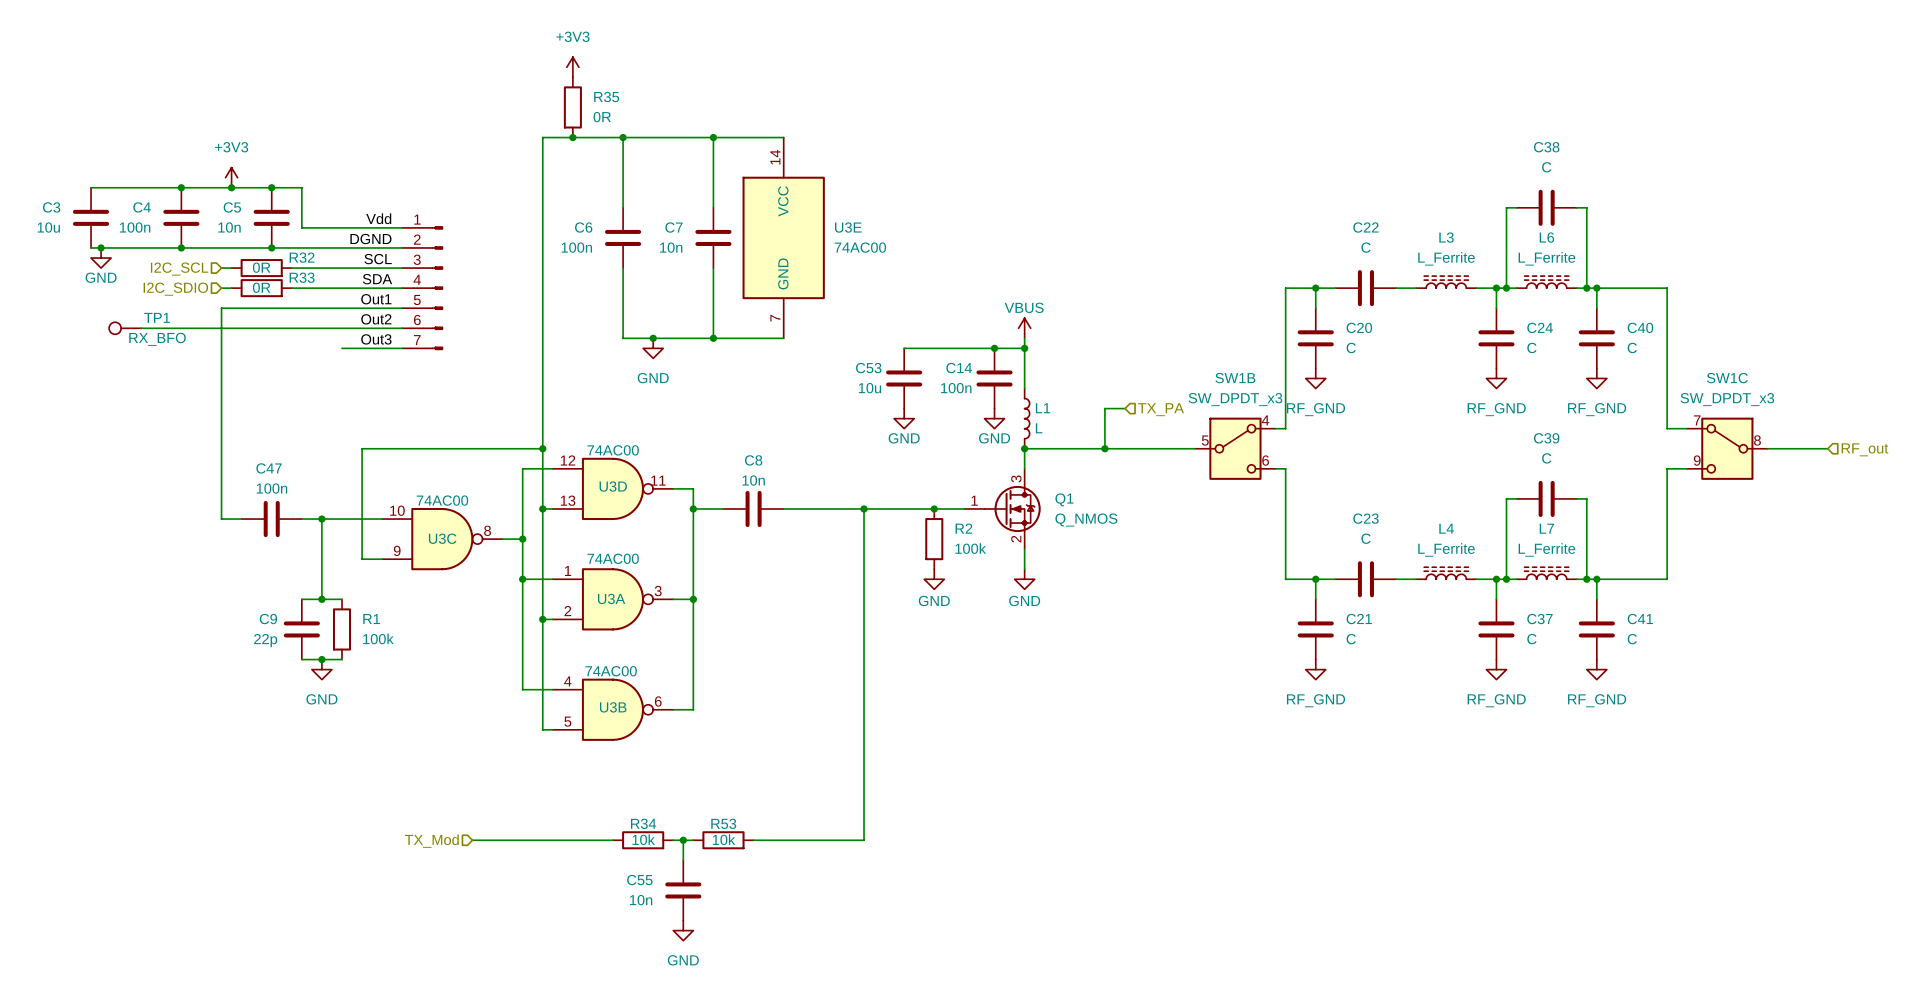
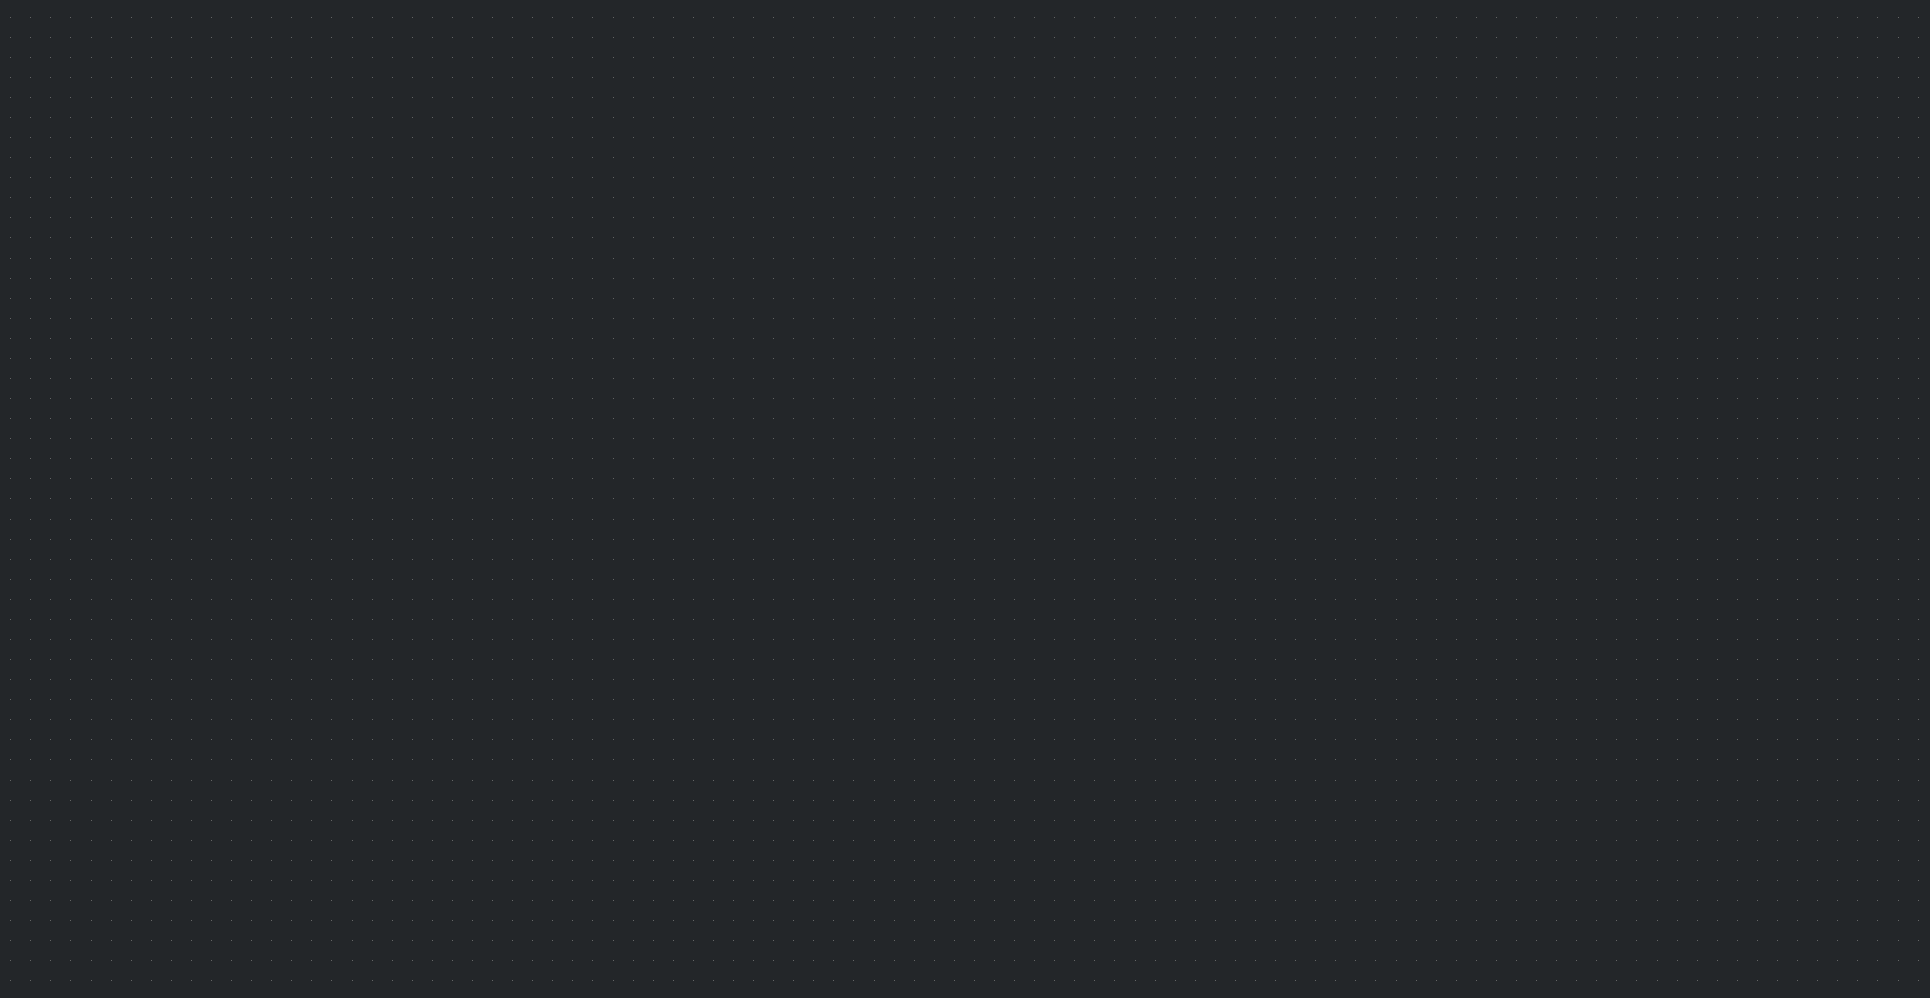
power symbol: +3V3 (572, 67) -> none
R35: 0R (572, 107) -> none
junction: (572, 137) -> none
wire: (623, 137) (623, 207) -> none
junction: (623, 137) -> none
wire: (713, 137) (713, 207) -> none
junction: (713, 137) -> none
wire: (783, 137) (542, 137) (542, 729) (552, 729) -> none
power symbol: +3V3 (231, 177) -> none
wire: (91, 187) (301, 187) (301, 227) (402, 227) -> none
junction: (181, 187) -> none
junction: (231, 187) -> none
junction: (271, 187) -> none
wire: (1516, 207) (1506, 207) (1506, 288) -> none
C38: C (1546, 207) -> none
wire: (1576, 207) (1586, 207) (1586, 288) -> none
C3: 10u (91, 217) -> none
C4: 100n (181, 217) -> none
C5: 10n (271, 217) -> none
label: Vdd (378, 218) -> none
C6: 100n (623, 237) -> none
C7: 10n (713, 237) -> none
U3E: 74AC00 (783, 237) -> none
label: DGND (370, 239) -> none
wire: (91, 247) (402, 247) -> none
junction: (101, 247) -> none
junction: (181, 247) -> none
junction: (271, 247) -> none
power symbol: GND (101, 258) -> none
label: SCL (378, 259) -> none
wire: (221, 268) (231, 268) -> none
R32: 0R (261, 268) -> none
wire: (291, 268) (402, 268) -> none
wire: (623, 268) (623, 338) (783, 338) -> none
wire: (713, 268) (713, 338) -> none
hierarchical label: I2C_SCL (179, 269) -> none
label: SDA (377, 279) -> none
L3: L_Ferrite (1446, 282) -> none
L6: L_Ferrite (1546, 282) -> none
wire: (221, 288) (231, 288) -> none
R33: 0R (261, 288) -> none
wire: (291, 288) (402, 288) -> none
part: (422, 288) -> none
wire: (1315, 288) (1315, 308) -> none
junction: (1315, 288) -> none
wire: (1335, 288) (1285, 288) (1285, 428) (1275, 428) -> none
C22: C (1365, 288) -> none
wire: (1396, 288) (1416, 288) -> none
wire: (1476, 288) (1516, 288) -> none
wire: (1496, 288) (1496, 308) -> none
junction: (1496, 288) -> none
junction: (1506, 288) -> none
wire: (1576, 288) (1667, 288) (1667, 428) (1687, 428) -> none
junction: (1586, 288) -> none
wire: (1596, 288) (1596, 308) -> none
junction: (1596, 288) -> none
hierarchical label: I2C_SDIO (175, 289) -> none
label: Out1 (376, 299) -> none
wire: (402, 308) (221, 308) (221, 519) (241, 519) -> none
label: Out2 (376, 319) -> none
TP1: RX_BFO (125, 328) -> none
wire: (141, 328) (402, 328) -> none
power symbol: VBUS (1024, 328) -> none
junction: (653, 338) -> none
junction: (713, 338) -> none
wire: (1024, 338) (1024, 388) -> none
C20: C (1315, 338) -> none
C24: C (1496, 338) -> none
C40: C (1596, 338) -> none
label: Out3 (376, 339) -> none
wire: (341, 348) (402, 348) -> none
power symbol: GND (653, 348) -> none
wire: (904, 348) (1024, 348) -> none
junction: (994, 348) -> none
junction: (1024, 348) -> none
C53: 10u (904, 378) -> none
C14: 100n (994, 378) -> none
power symbol: RF_GND (1315, 378) -> none
power symbol: RF_GND (1496, 378) -> none
power symbol: RF_GND (1596, 378) -> none
wire: (1125, 408) (1104, 408) (1104, 448) -> none
hierarchical label: TX_PA (1161, 409) -> none
power symbol: GND (904, 418) -> none
power symbol: GND (994, 418) -> none
L1: L (1027, 418) -> none
wire: (542, 448) (362, 448) (362, 559) (382, 559) -> none
junction: (542, 448) -> none
junction: (1024, 448) -> none
junction: (1104, 448) -> none
wire: (1195, 448) (1024, 448) (1024, 468) -> none
SW1B: SW_DPDT_x3 (1235, 448) -> none
SW1C: SW_DPDT_x3 (1727, 448) -> none
wire: (1767, 448) (1827, 448) -> none
hierarchical label: RF_out (1864, 449) -> none
wire: (552, 468) (522, 468) (522, 689) (552, 689) -> none
wire: (1275, 468) (1285, 468) (1285, 579) (1335, 579) -> none
wire: (1687, 468) (1667, 468) (1667, 579) (1576, 579) -> none
U3D: 74AC00 (613, 488) -> none
wire: (673, 488) (693, 488) (693, 709) (673, 709) -> none
wire: (1516, 498) (1506, 498) (1506, 579) -> none
C39: C (1546, 498) -> none
wire: (1576, 498) (1586, 498) (1586, 579) -> none
wire: (542, 508) (552, 508) -> none
junction: (542, 508) -> none
wire: (693, 508) (723, 508) -> none
junction: (693, 508) -> none
C8: 10n (753, 508) -> none
wire: (783, 508) (964, 508) -> none
wire: (864, 508) (864, 840) (753, 840) -> none
junction: (864, 508) -> none
junction: (934, 508) -> none
Q1: Q_NMOS (1002, 508) -> none
C47: 100n (271, 519) -> none
wire: (301, 519) (382, 519) -> none
wire: (321, 519) (321, 599) -> none
junction: (321, 519) -> none
U3C: 74AC00 (442, 539) -> none
wire: (502, 539) (522, 539) -> none
junction: (522, 539) -> none
R2: 100k (934, 539) -> none
wire: (1024, 549) (1024, 569) -> none
L4: L_Ferrite (1446, 573) -> none
L7: L_Ferrite (1546, 573) -> none
wire: (522, 579) (552, 579) -> none
junction: (522, 579) -> none
power symbol: GND (934, 579) -> none
power symbol: GND (1024, 579) -> none
wire: (1315, 579) (1315, 599) -> none
junction: (1315, 579) -> none
C23: C (1365, 579) -> none
wire: (1396, 579) (1416, 579) -> none
wire: (1476, 579) (1516, 579) -> none
wire: (1496, 579) (1496, 599) -> none
junction: (1496, 579) -> none
junction: (1506, 579) -> none
junction: (1586, 579) -> none
wire: (1596, 579) (1596, 599) -> none
junction: (1596, 579) -> none
wire: (301, 599) (341, 599) -> none
junction: (321, 599) -> none
U3A: 74AC00 (613, 599) -> none
wire: (673, 599) (693, 599) -> none
junction: (693, 599) -> none
wire: (542, 619) (552, 619) -> none
junction: (542, 619) -> none
C9: 22p (301, 629) -> none
R1: 100k (341, 629) -> none
C21: C (1315, 629) -> none
C37: C (1496, 629) -> none
C41: C (1596, 629) -> none
wire: (301, 659) (341, 659) -> none
junction: (321, 659) -> none
power symbol: GND (321, 669) -> none
power symbol: RF_GND (1315, 669) -> none
power symbol: RF_GND (1496, 669) -> none
power symbol: RF_GND (1596, 669) -> none
U3B: 74AC00 (613, 709) -> none
wire: (472, 840) (613, 840) -> none
R34: 10k (643, 840) -> none
wire: (673, 840) (693, 840) -> none
wire: (683, 840) (683, 860) -> none
junction: (683, 840) -> none
R53: 10k (723, 840) -> none
hierarchical label: TX_Mod (431, 841) -> none
C55: 10n (683, 890) -> none
power symbol: GND (683, 930) -> none

